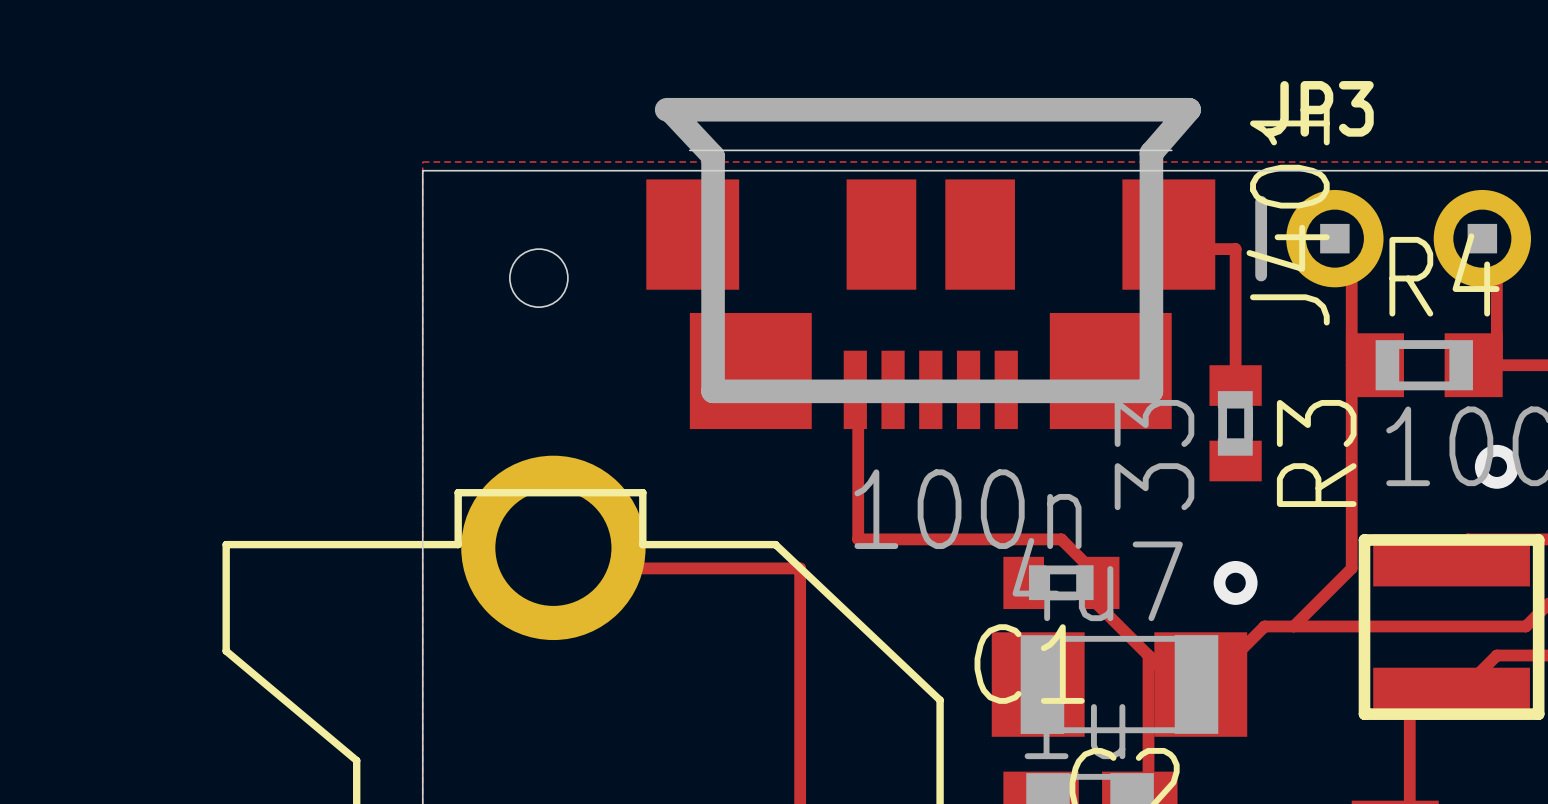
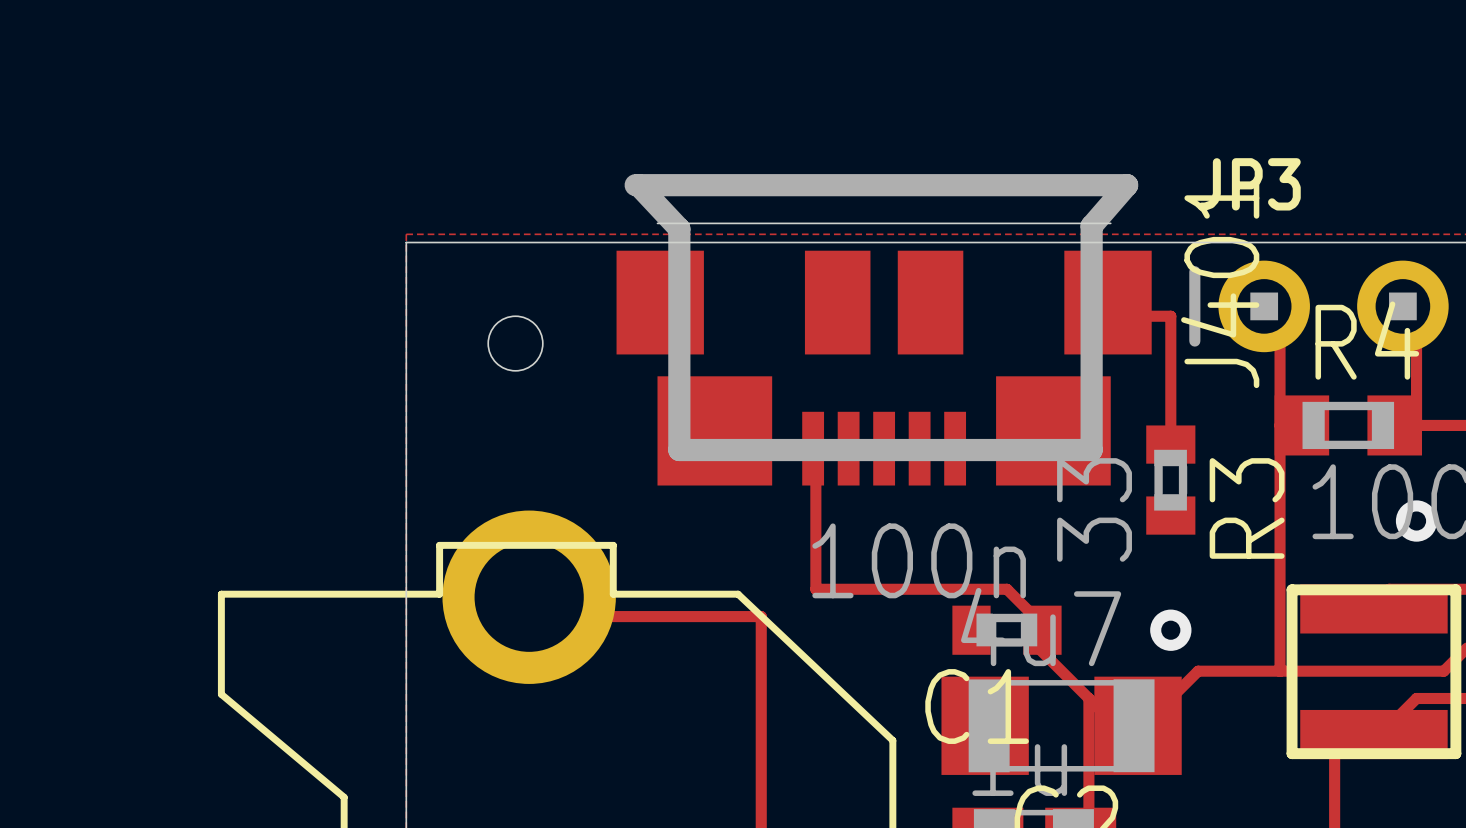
track: (1351, 568) (1293, 626) -> (1280, 616) (1280, 671)

